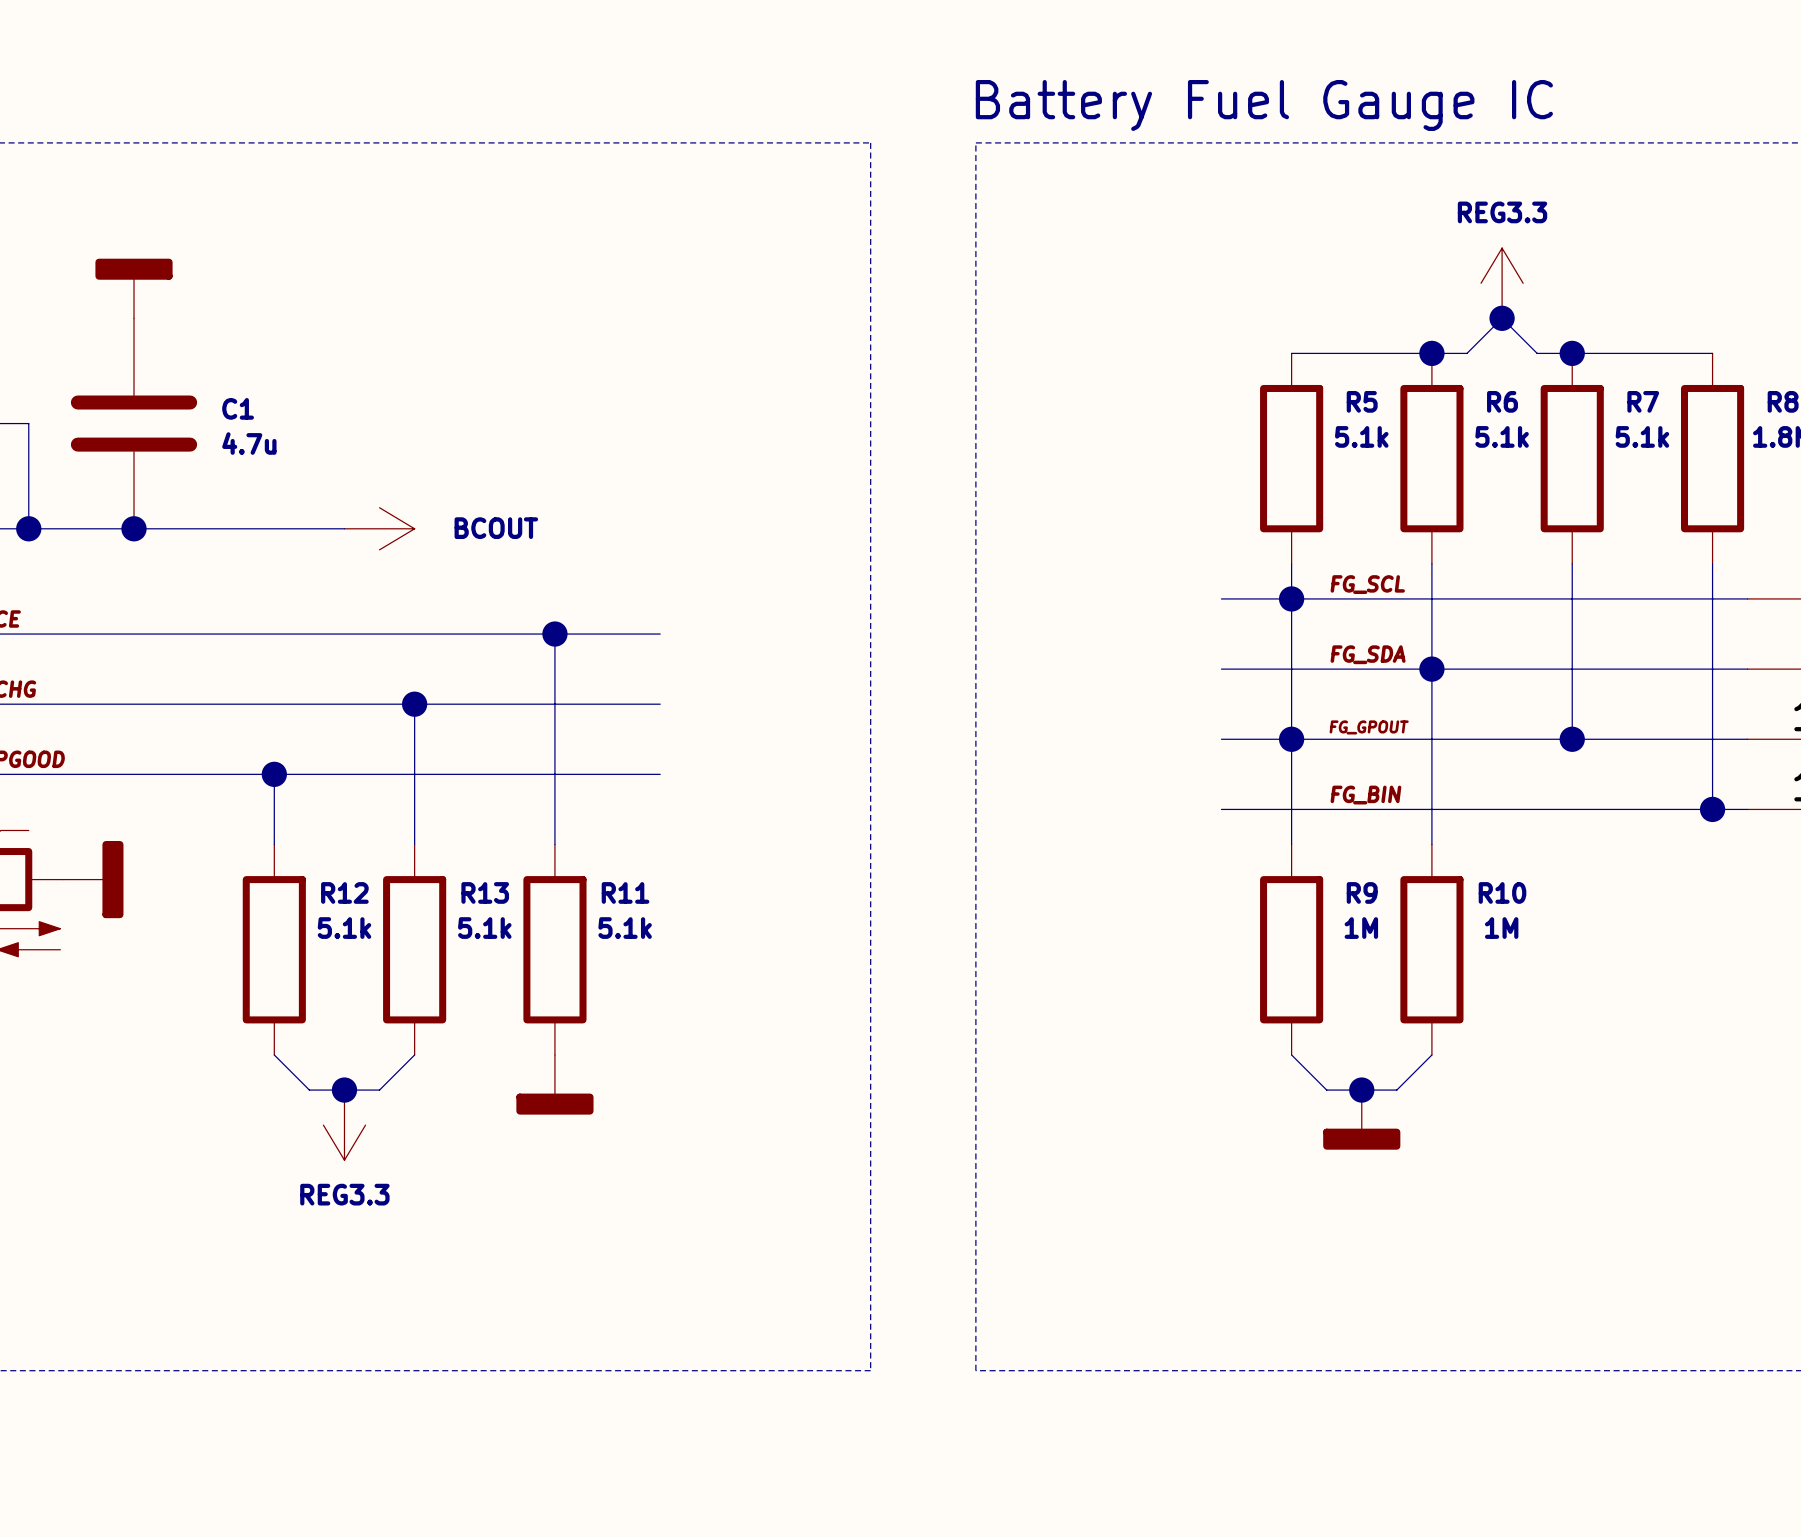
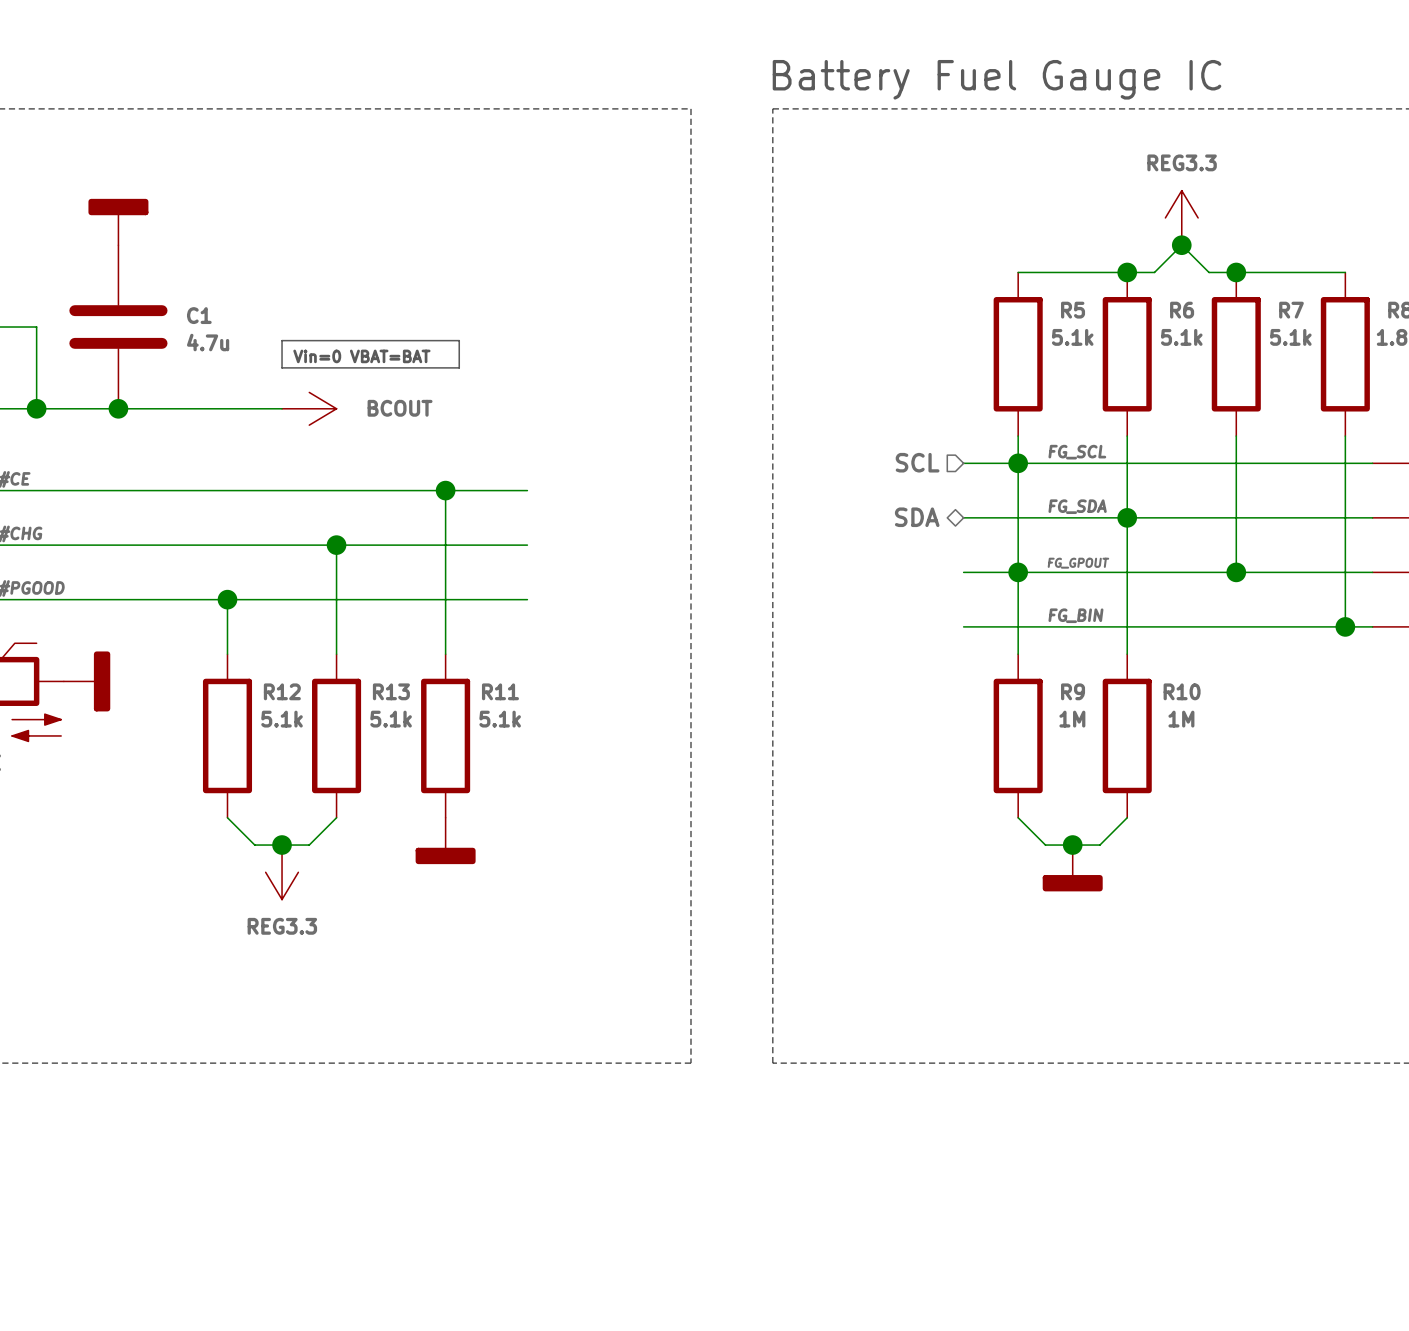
line: none -> (282, 340) (459, 340) (459, 367) (282, 367) (282, 340)
text: none -> Vin=0 VBAT=BAT (361, 356)
hierarchical label: none -> SCL (917, 462)
hierarchical label: none -> SDA (917, 517)

